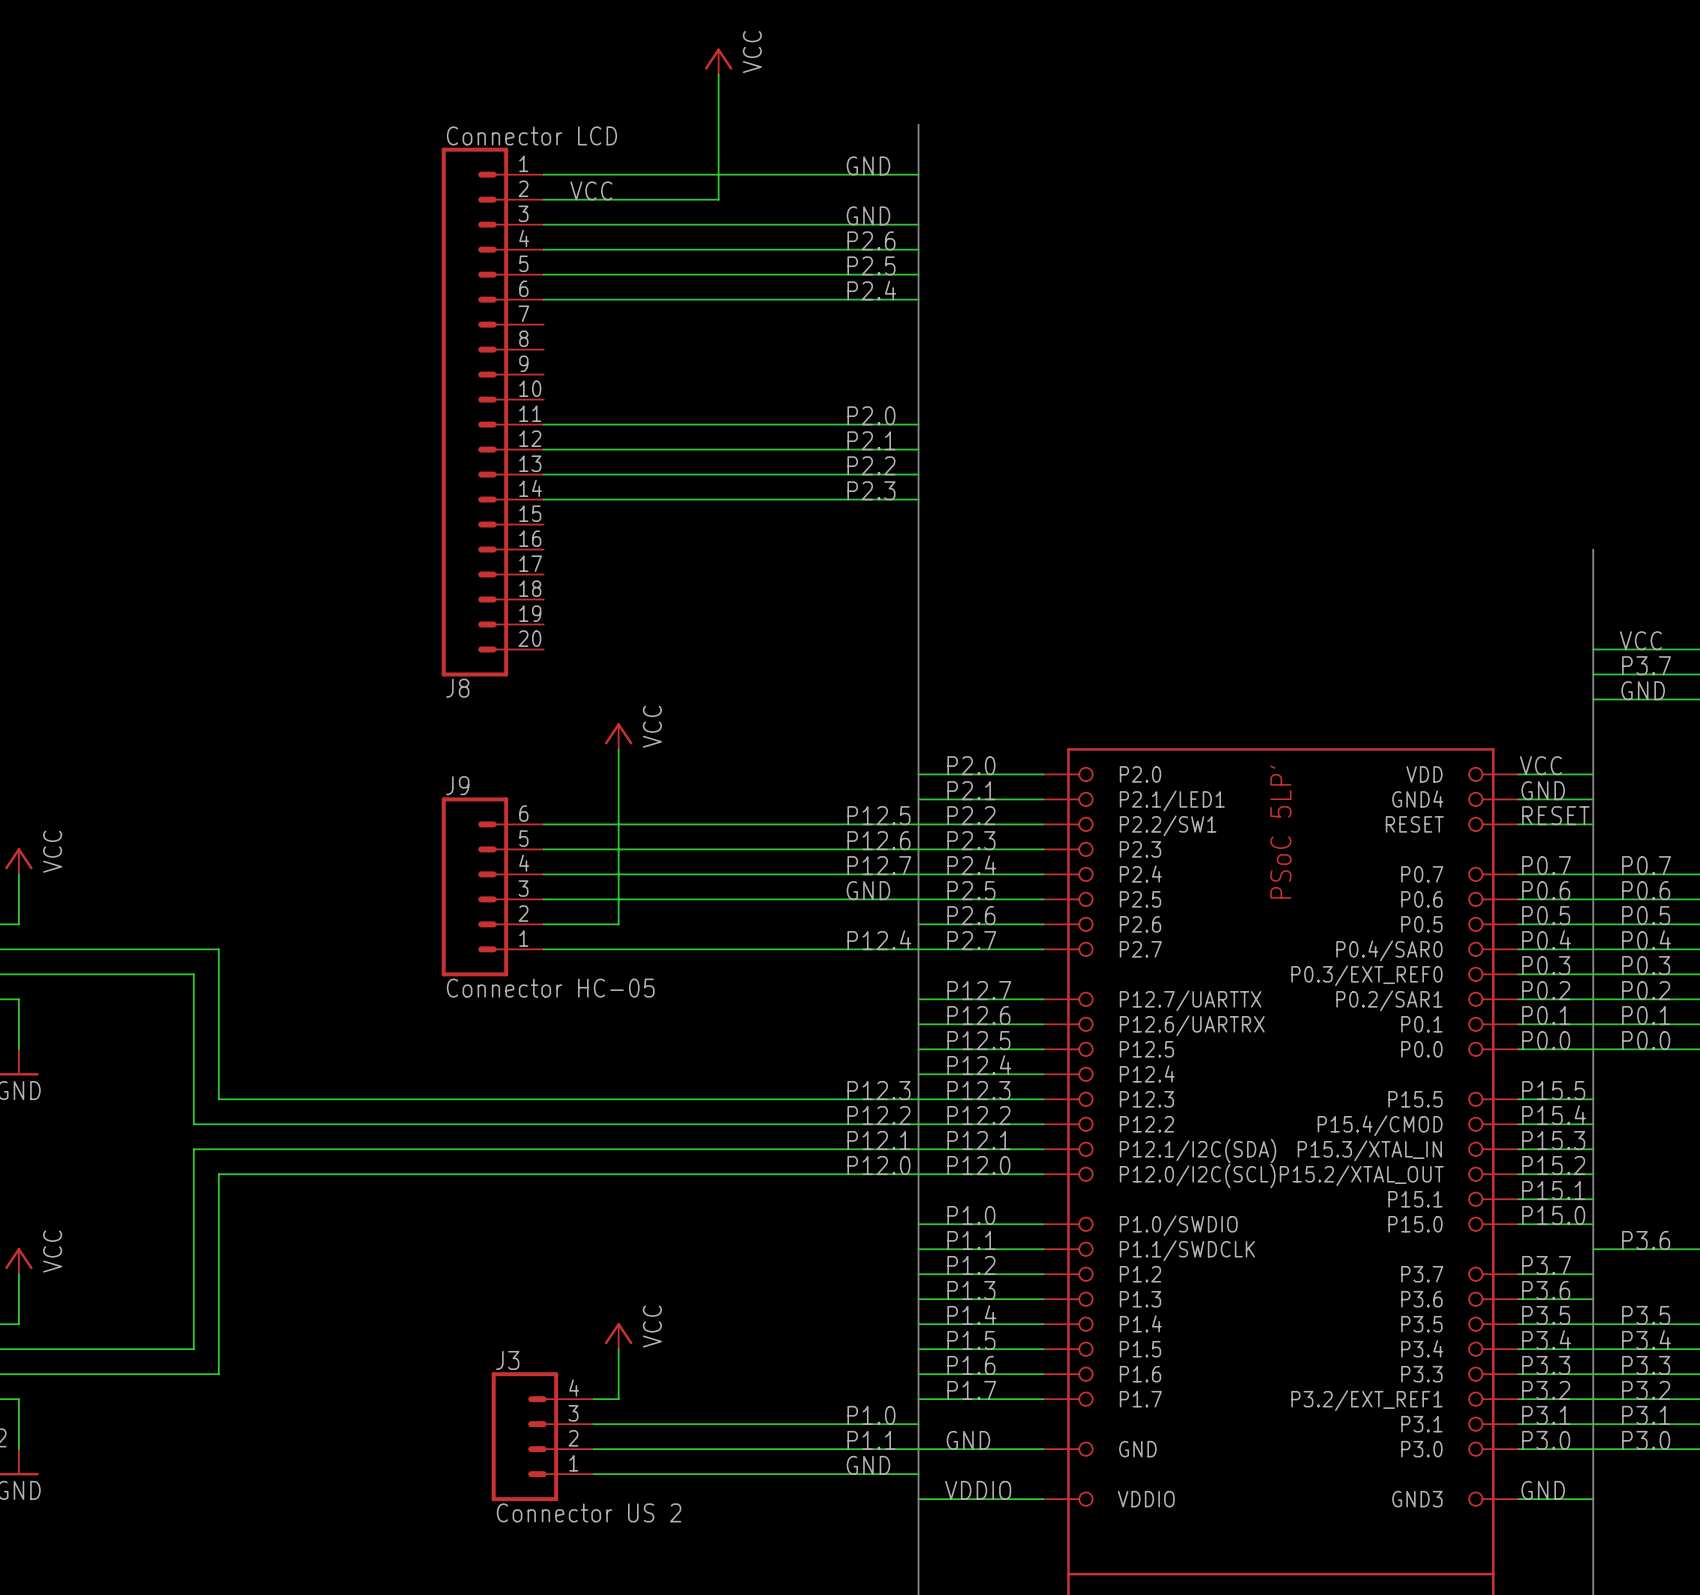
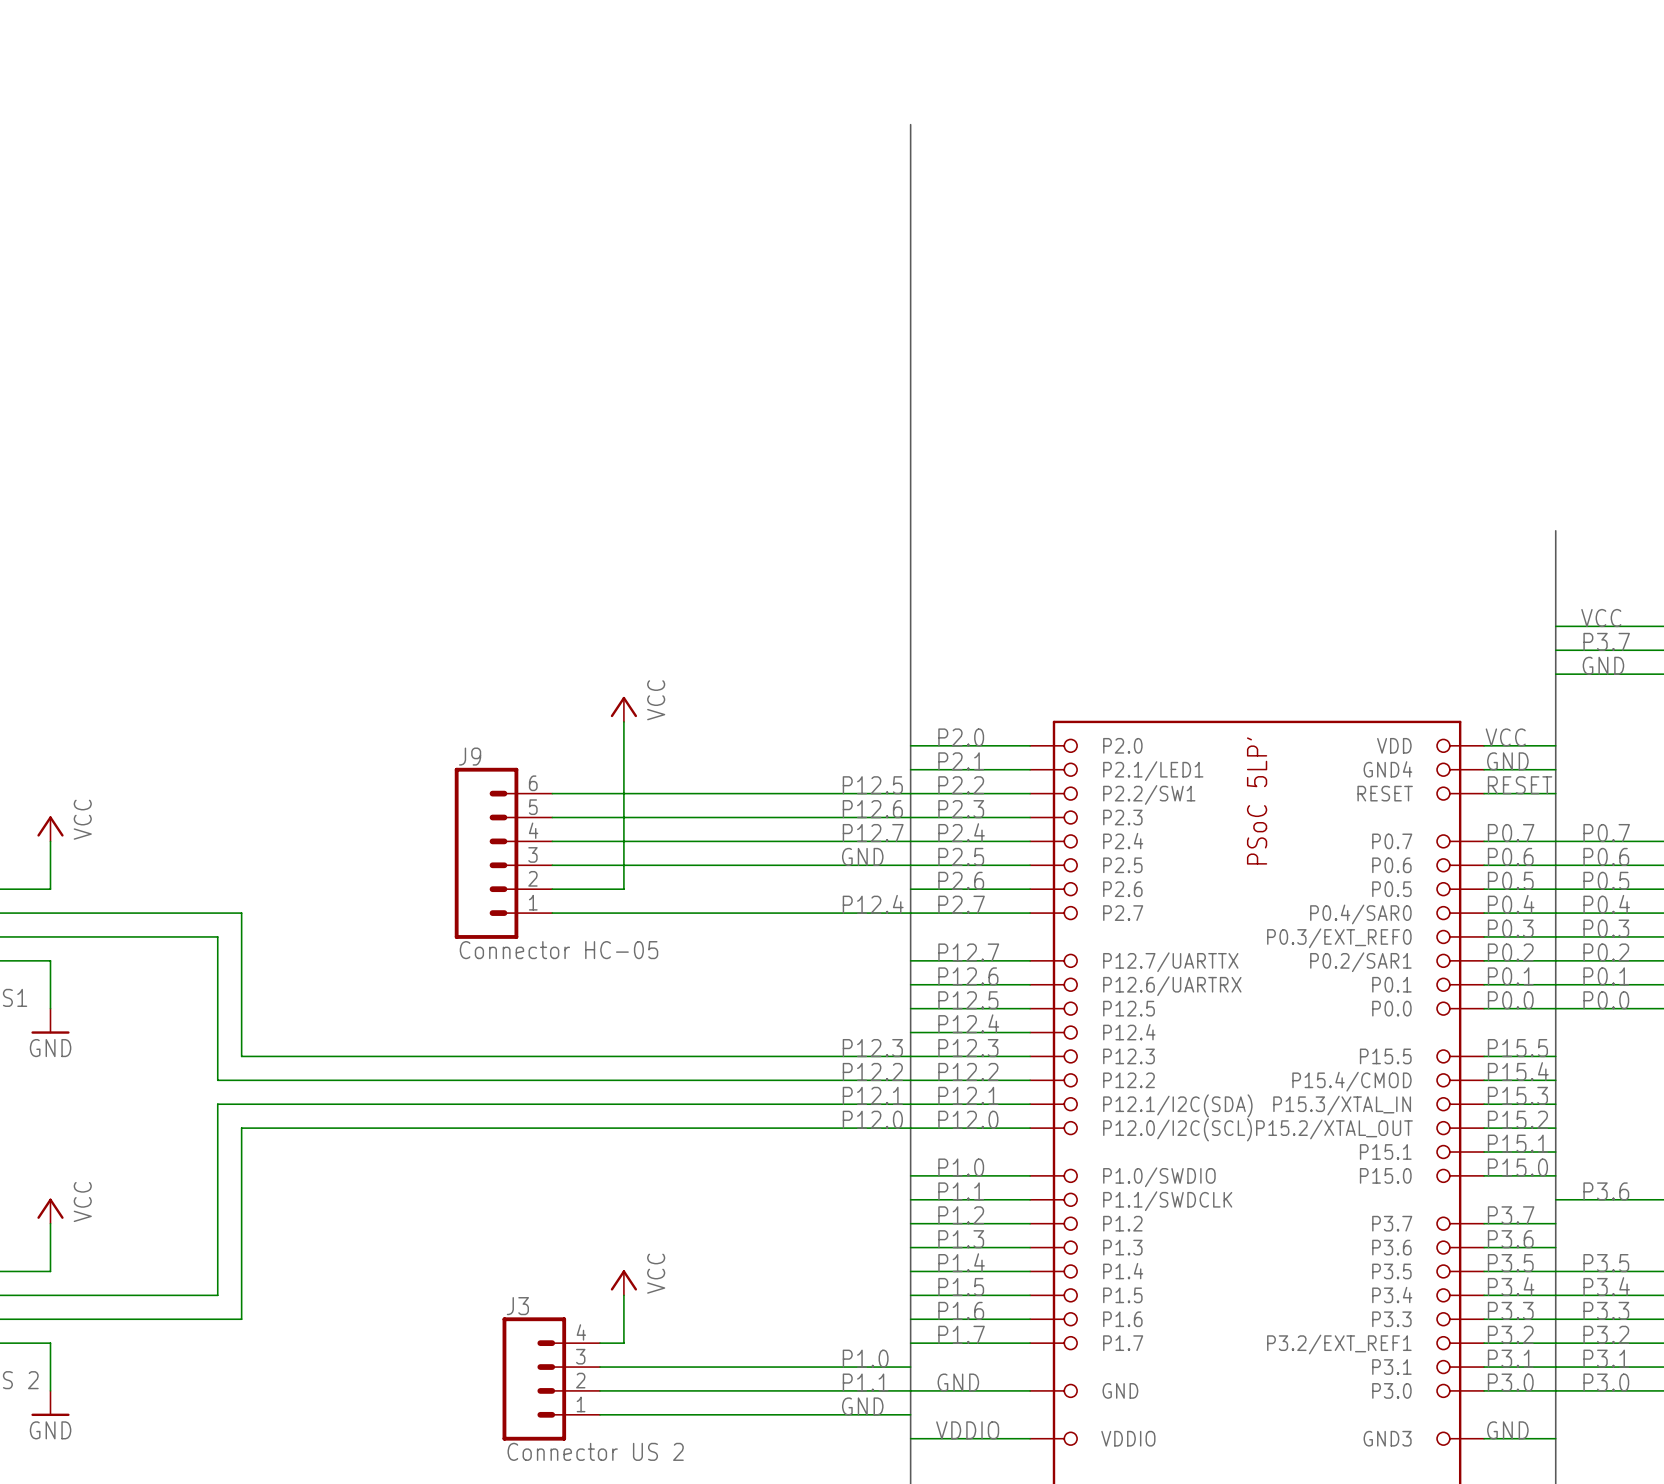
power symbol: VCC (718, 61) -> none
wire: (718, 74) (718, 199) (543, 199) -> none
label: GND (868, 165) -> none
wire: (543, 174) (918, 174) -> none
label: VCC (591, 190) -> none
label: GND (868, 215) -> none
wire: (543, 224) (918, 224) -> none
label: P2.6 (871, 240) -> none
wire: (543, 249) (918, 249) -> none
label: P2.5 (871, 265) -> none
wire: (543, 274) (918, 274) -> none
label: P2.4 (871, 290) -> none
wire: (543, 299) (918, 299) -> none
J8: Connector LCD (492, 412) -> none
label: P2.0 (871, 415) -> none
wire: (543, 424) (918, 424) -> none
label: P2.1 (871, 440) -> none
wire: (543, 449) (918, 449) -> none
label: P2.2 (871, 465) -> none
wire: (543, 474) (918, 474) -> none
label: P2.3 (871, 490) -> none
wire: (543, 499) (918, 499) -> none

